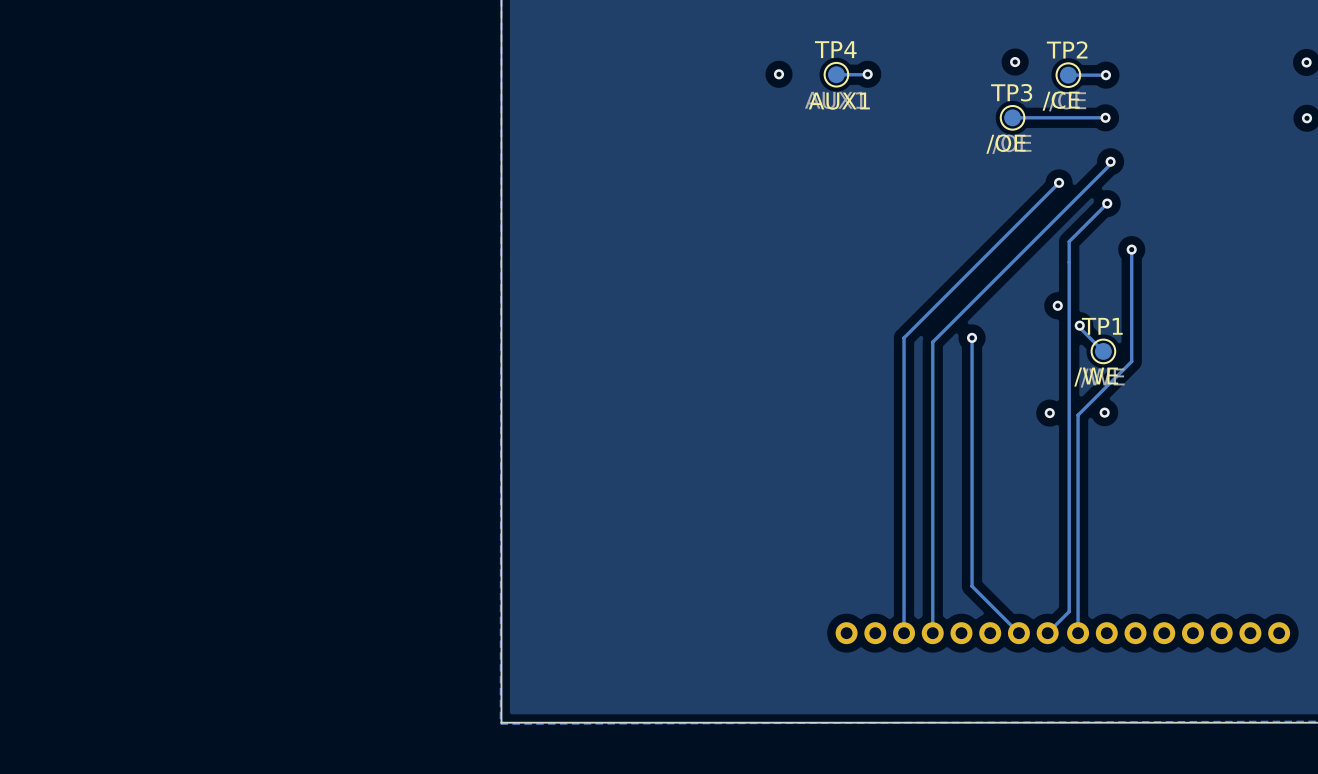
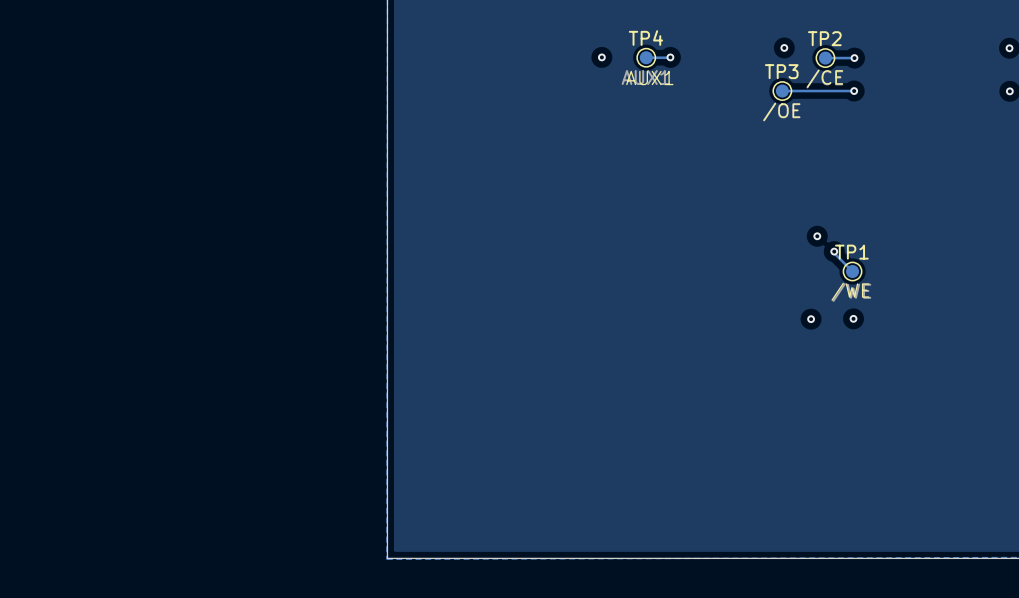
track: (1110, 161) (1110, 164) (932, 342) (932, 633) -> none
via: (1110, 161) -> none
track: (1059, 182) (904, 337) (904, 633) -> none
via: (1059, 182) -> none
track: (1107, 203) (1069, 241) (1069, 611) (1047, 633) -> none
via: (1107, 203) -> none
track: (1131, 249) (1131, 361) (1078, 415) (1078, 633) -> none
via: (1131, 249) -> none
track: (972, 337) (972, 586) (1018, 633) -> none
via: (972, 337) -> none
part: (947, 633) -> none
part: (1178, 633) -> none

